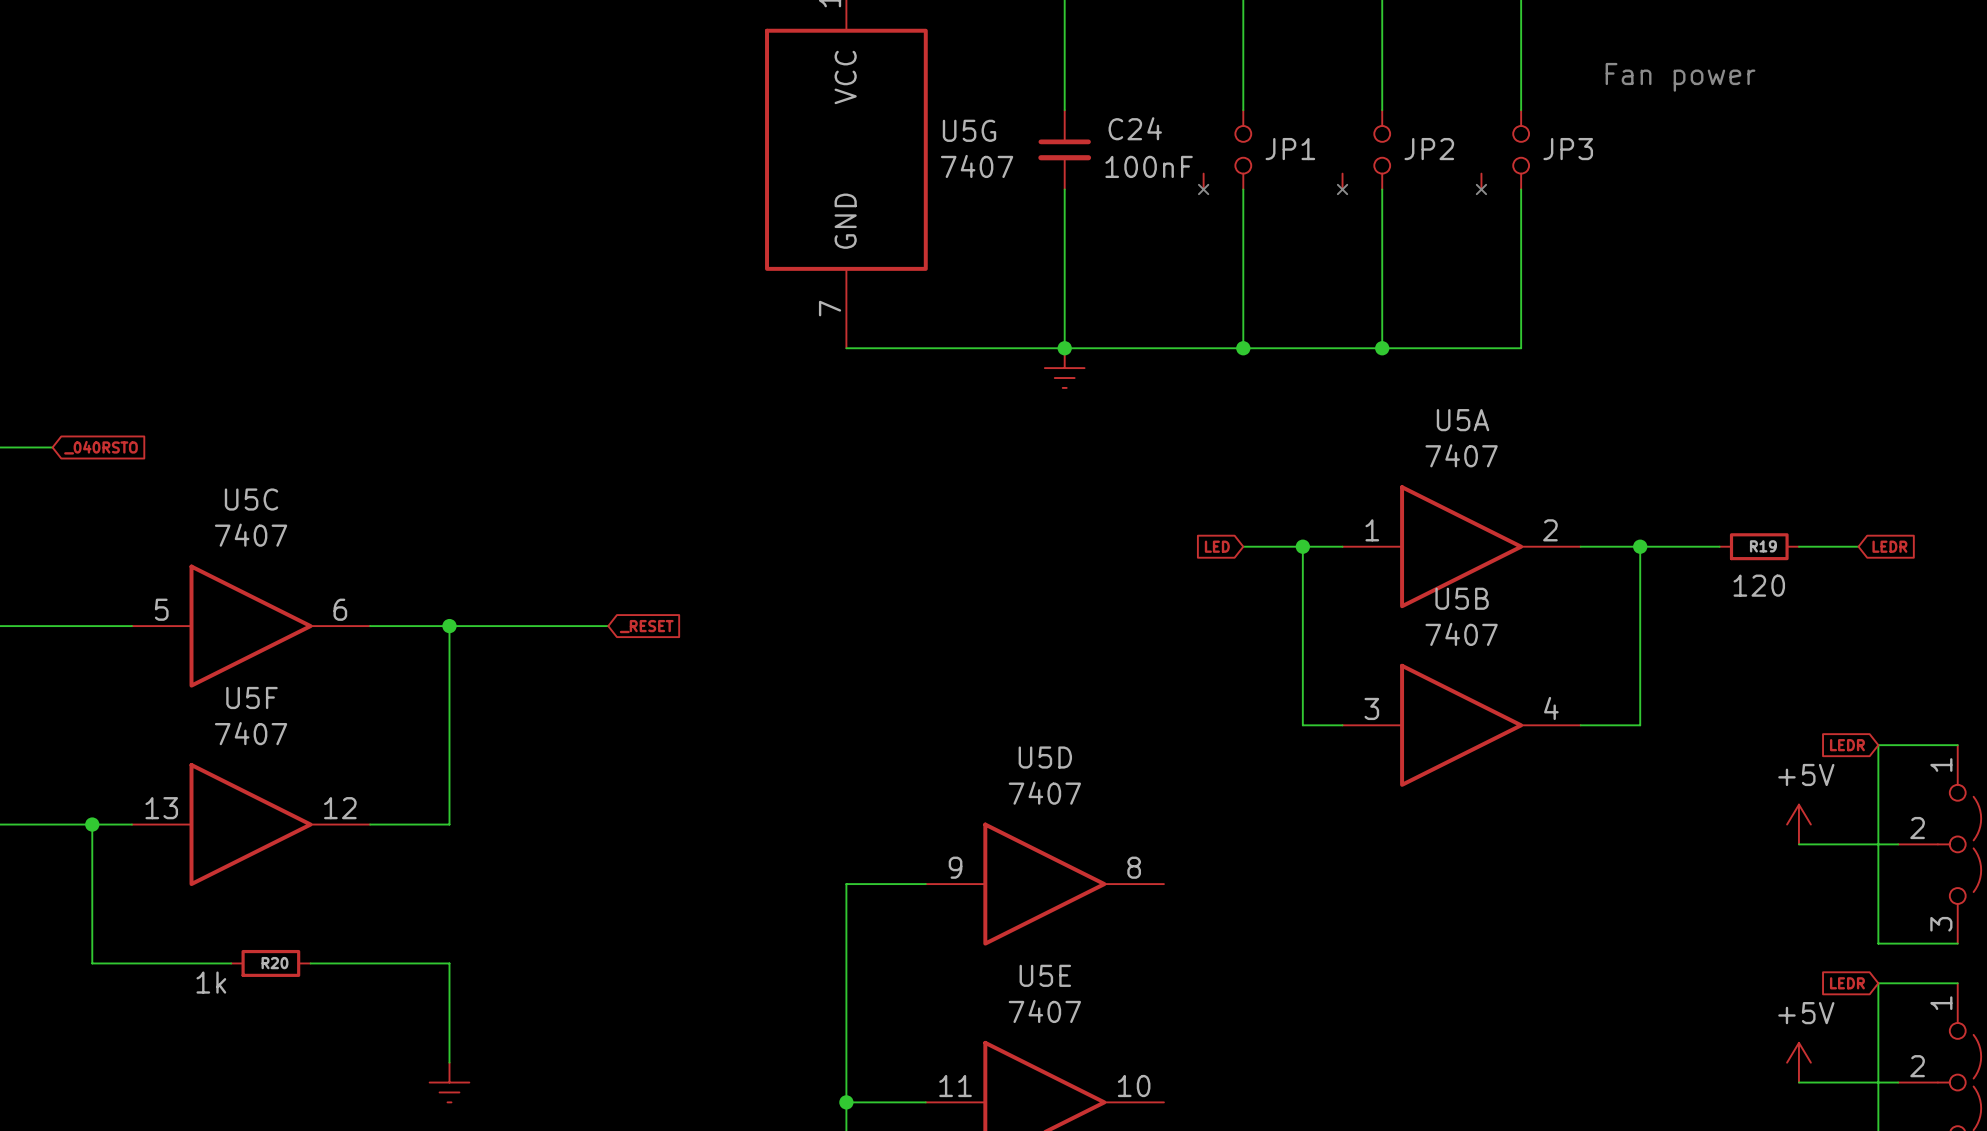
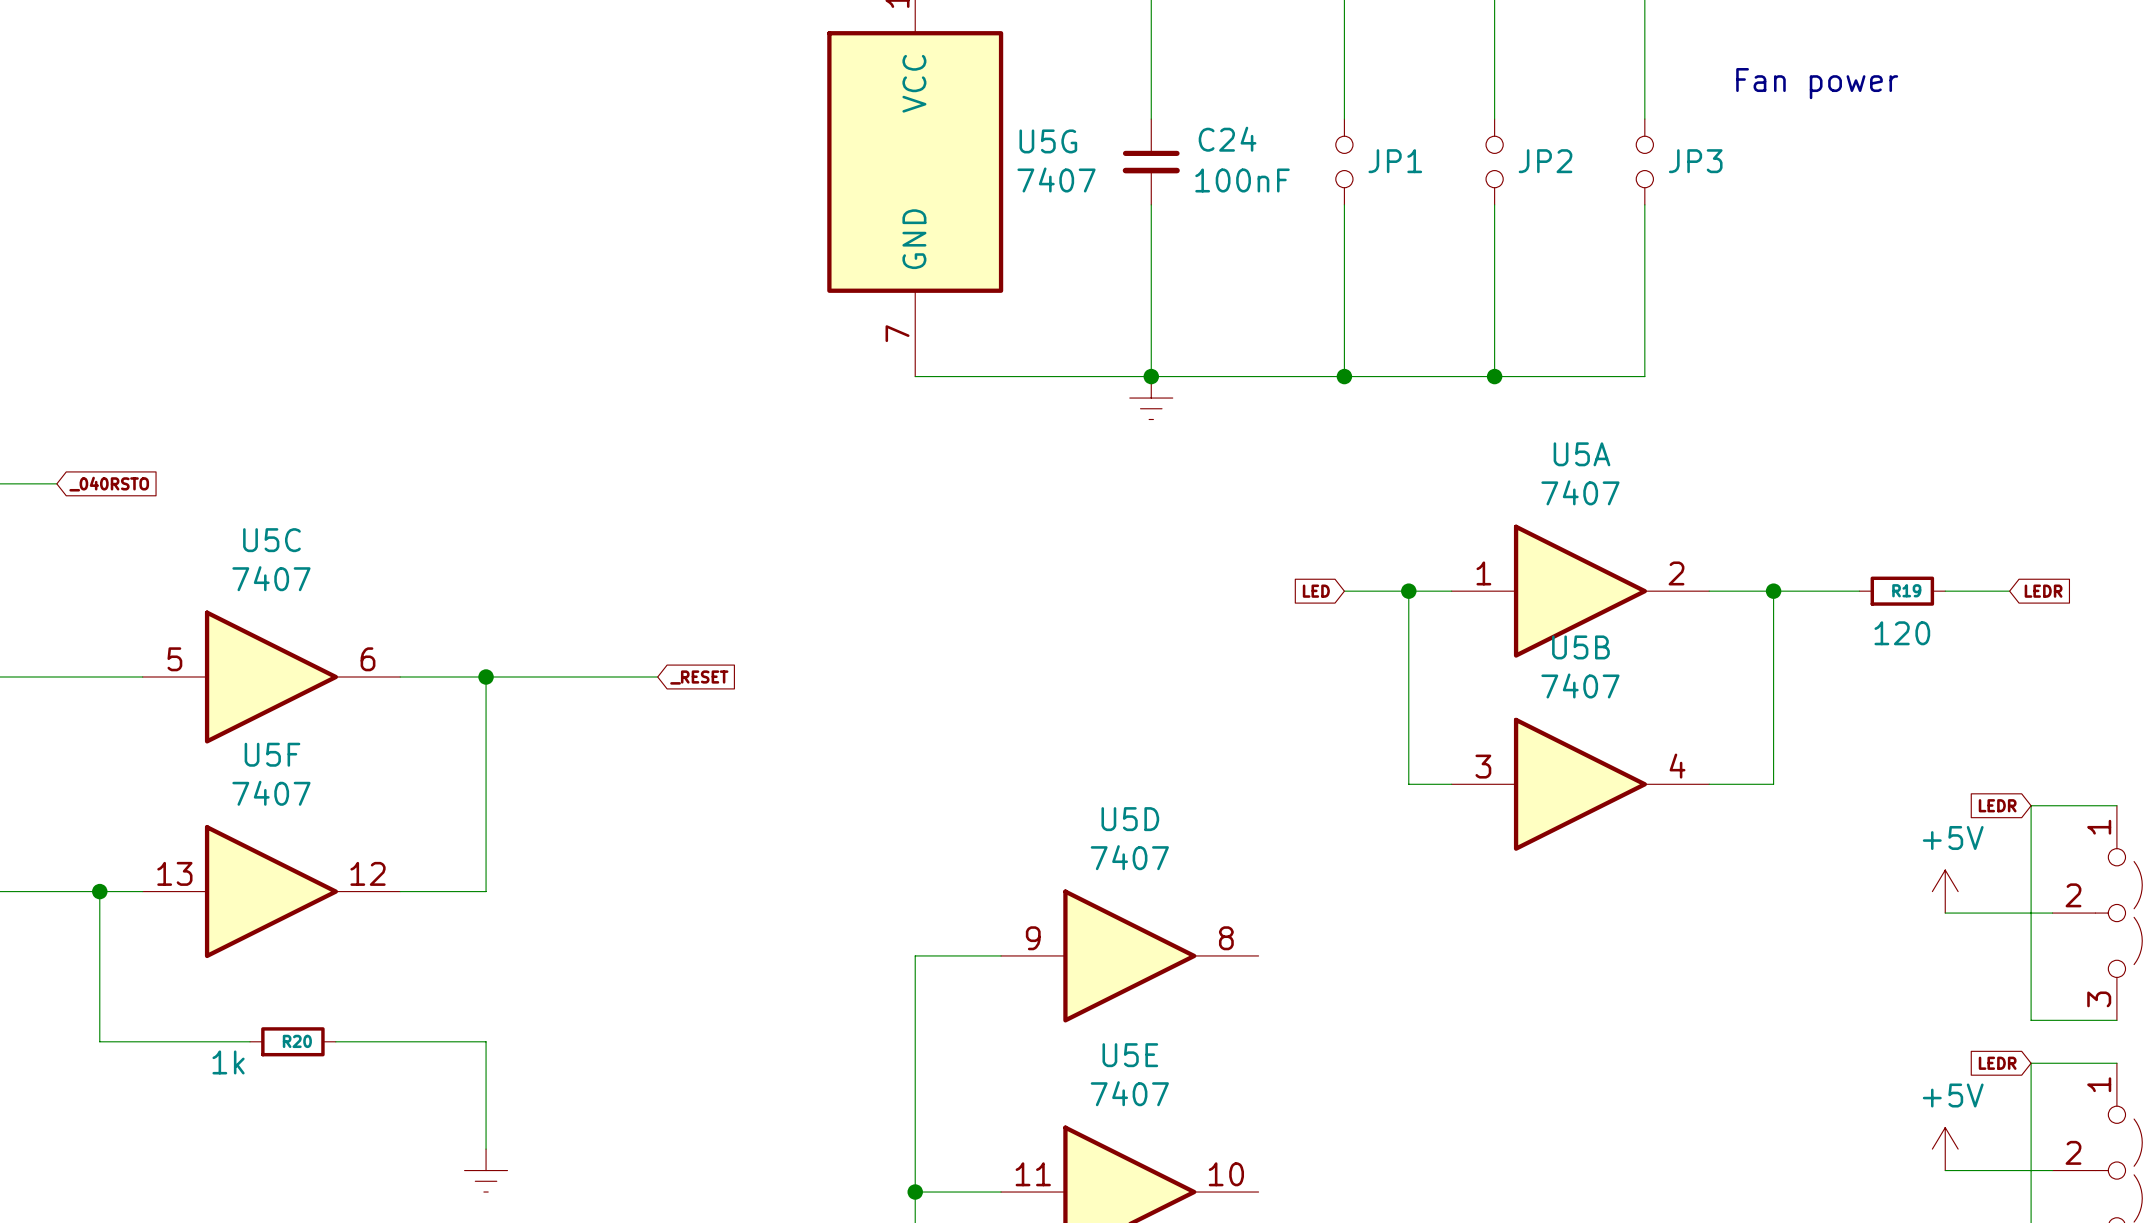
JP1 symbol: [1198, 110, 1252, 195] -> [1335, 119, 1353, 205]
JP2 symbol: [1337, 110, 1391, 195] -> [1486, 119, 1504, 205]
JP3 symbol: [1476, 110, 1530, 195] -> [1636, 119, 1654, 205]

